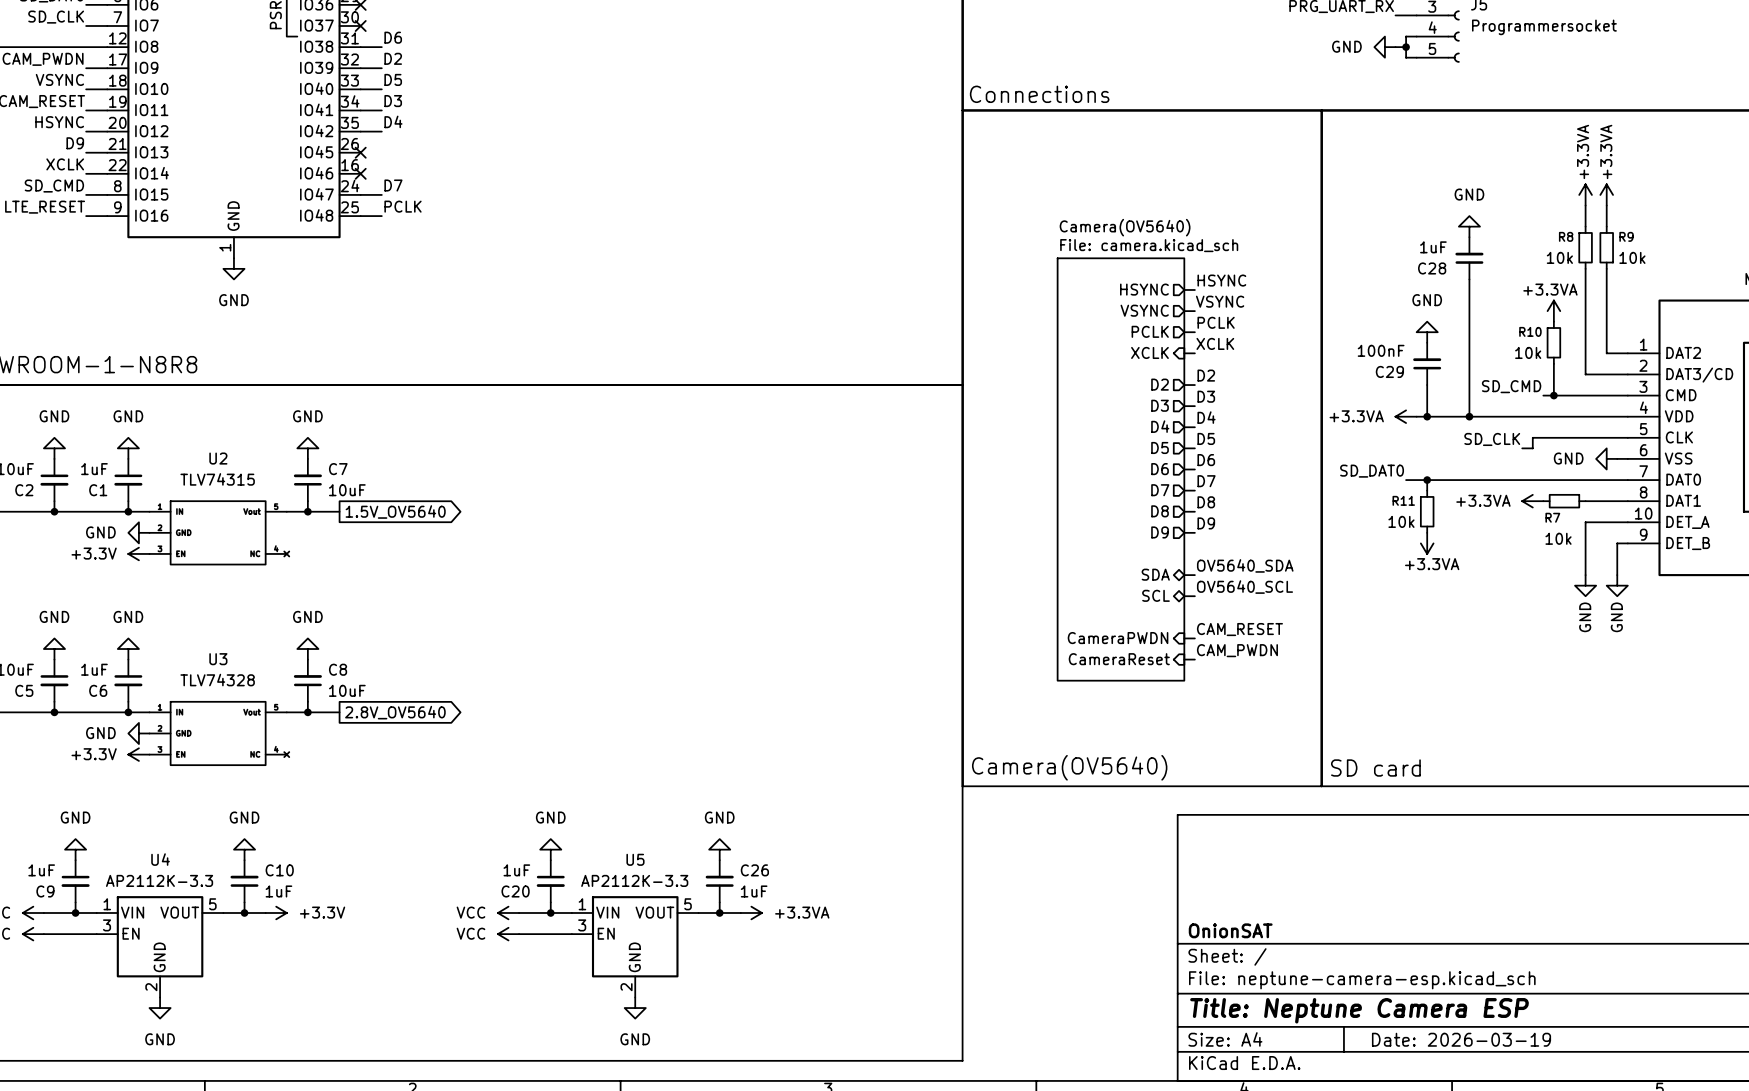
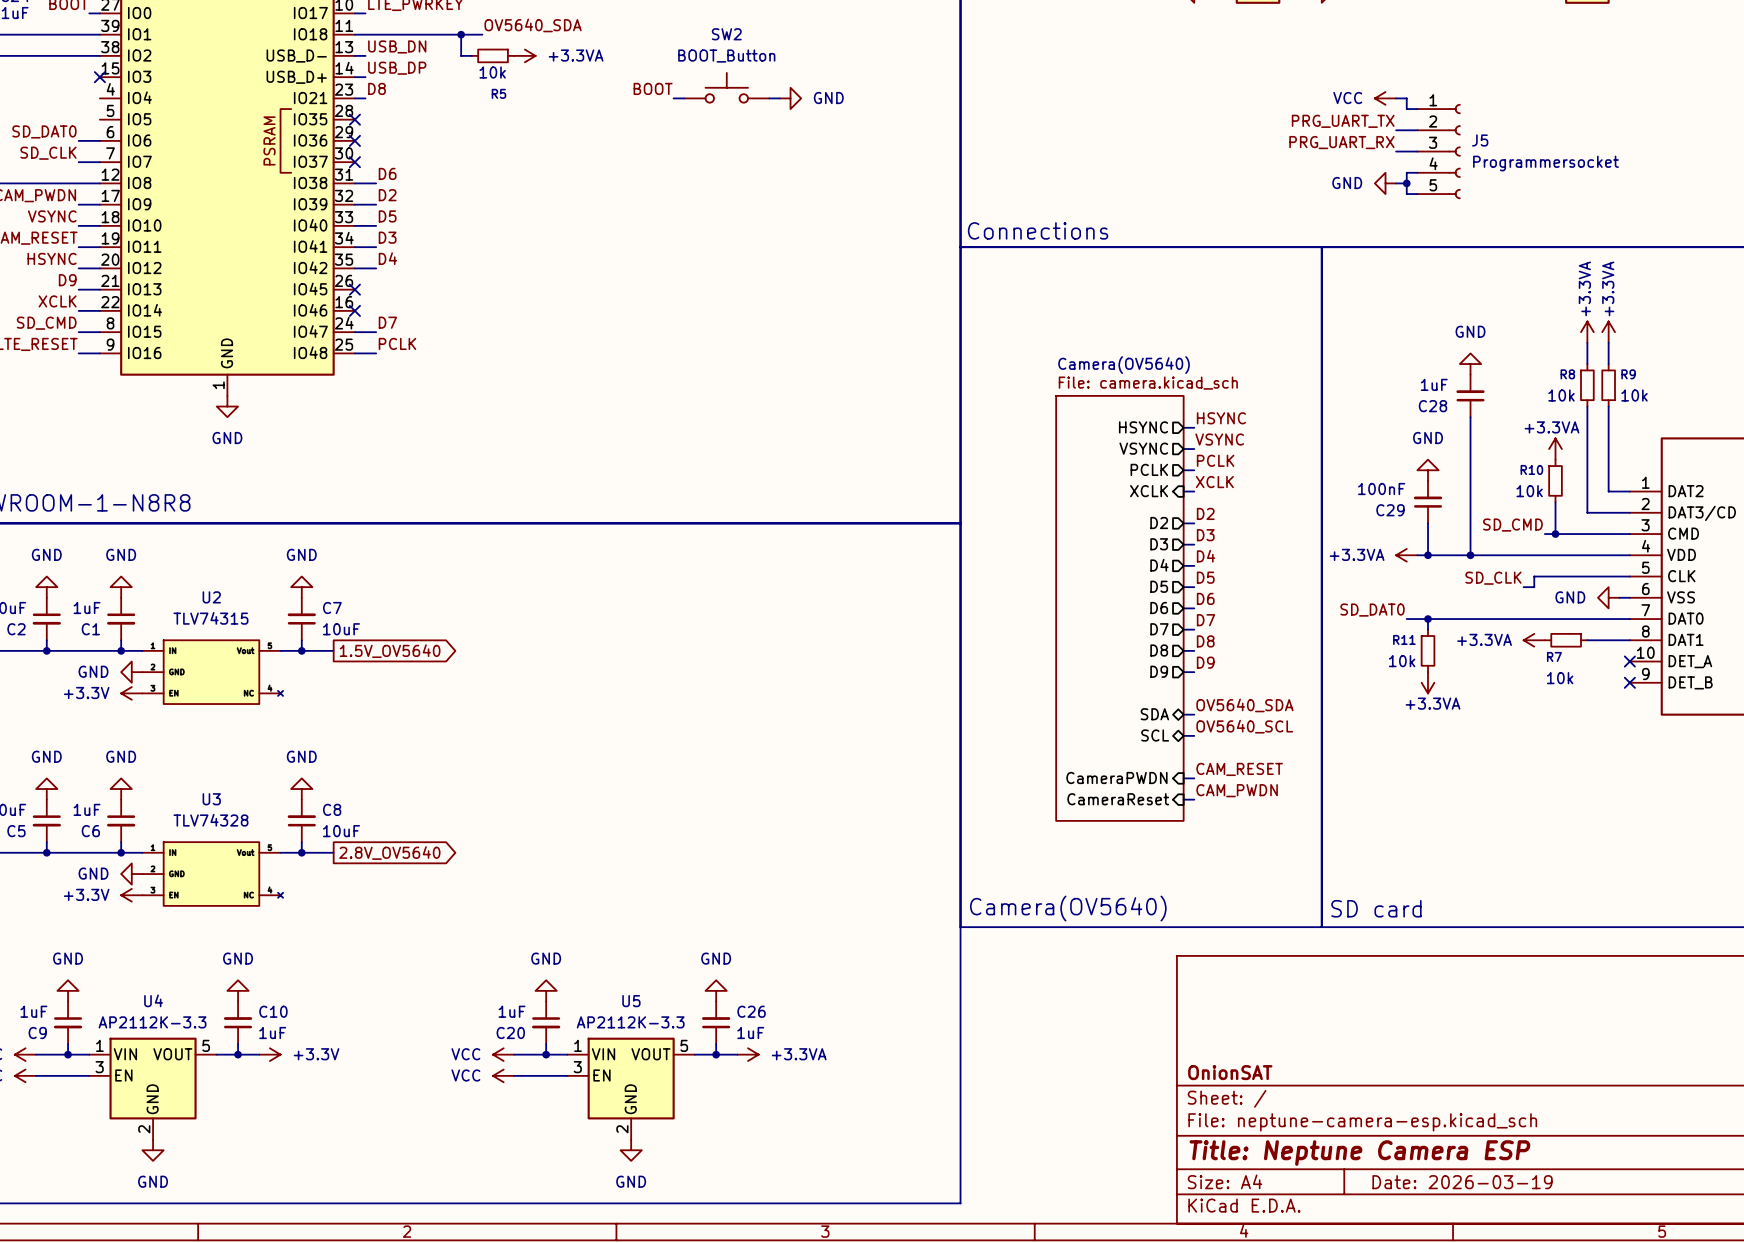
wire: (1627, 522) (1585, 522) (1585, 575) -> none
no-connect mark: none -> (1629, 661)
wire: (1627, 543) (1617, 543) (1617, 575) -> none
no-connect mark: none -> (1629, 682)
power symbol: GND (1585, 585) -> none
power symbol: GND (1617, 585) -> none

